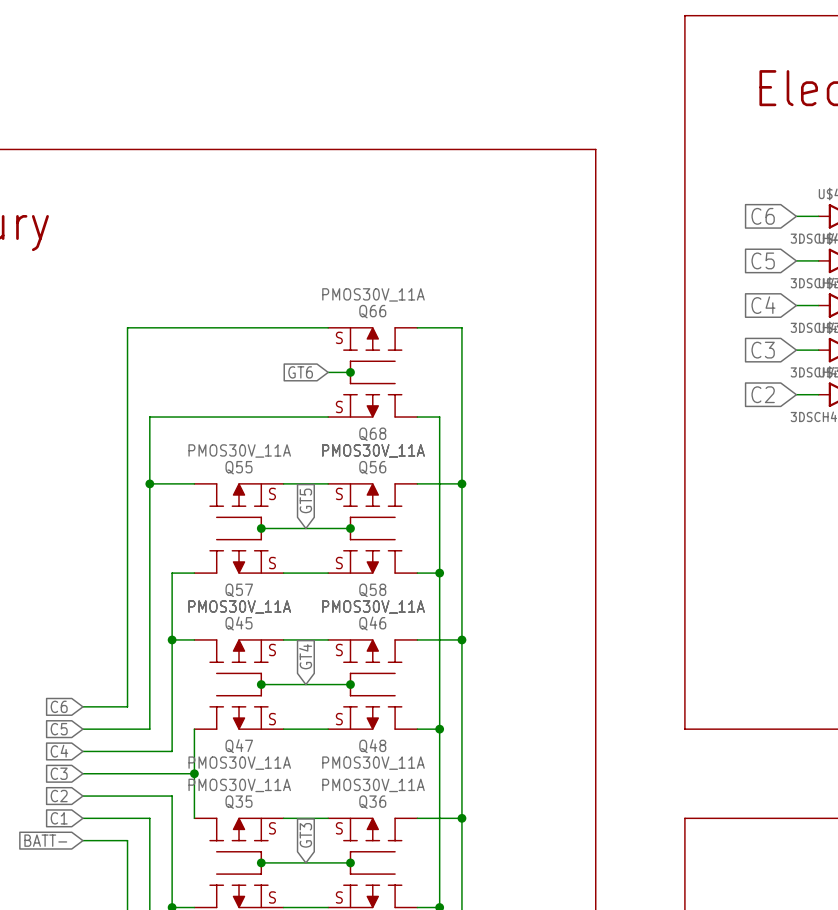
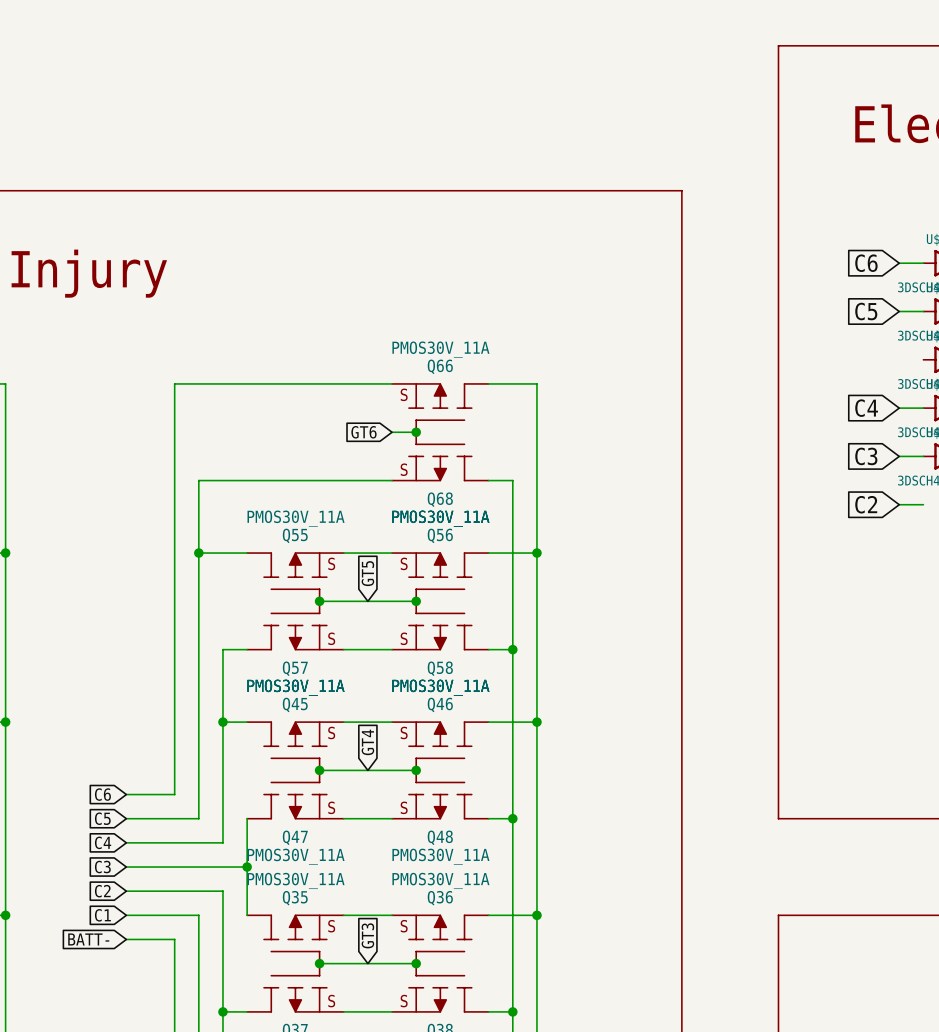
global label: C4 (763, 305) -> none
wire: (796, 305) (818, 305) -> (899, 504) (923, 504)
global label: C3 (763, 350) -> C4 (866, 408)
global label: C2 (763, 394) -> C3 (866, 456)
global label: none -> C2 (866, 504)

